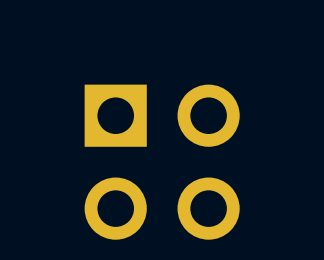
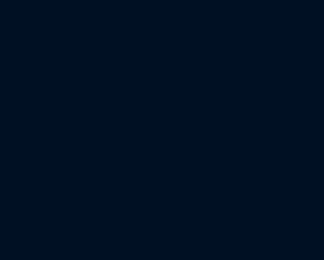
part: (162, 162) -> none

